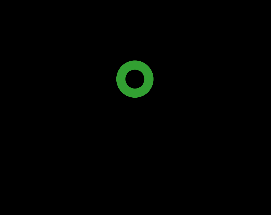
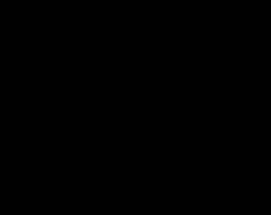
via: (134, 79) -> none

